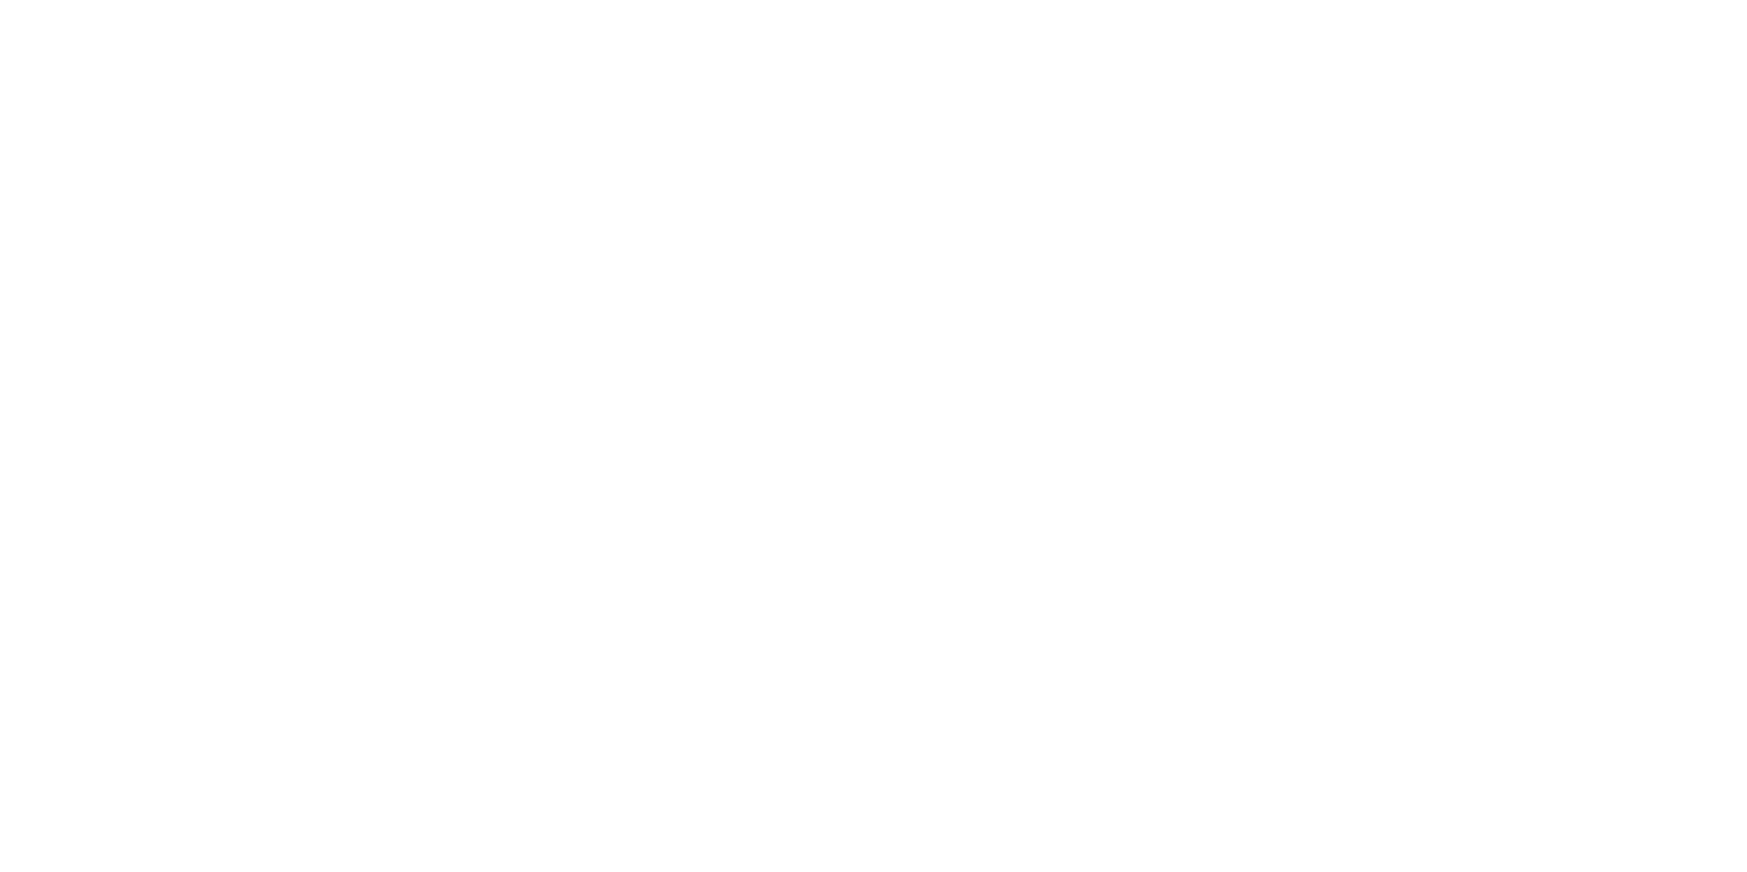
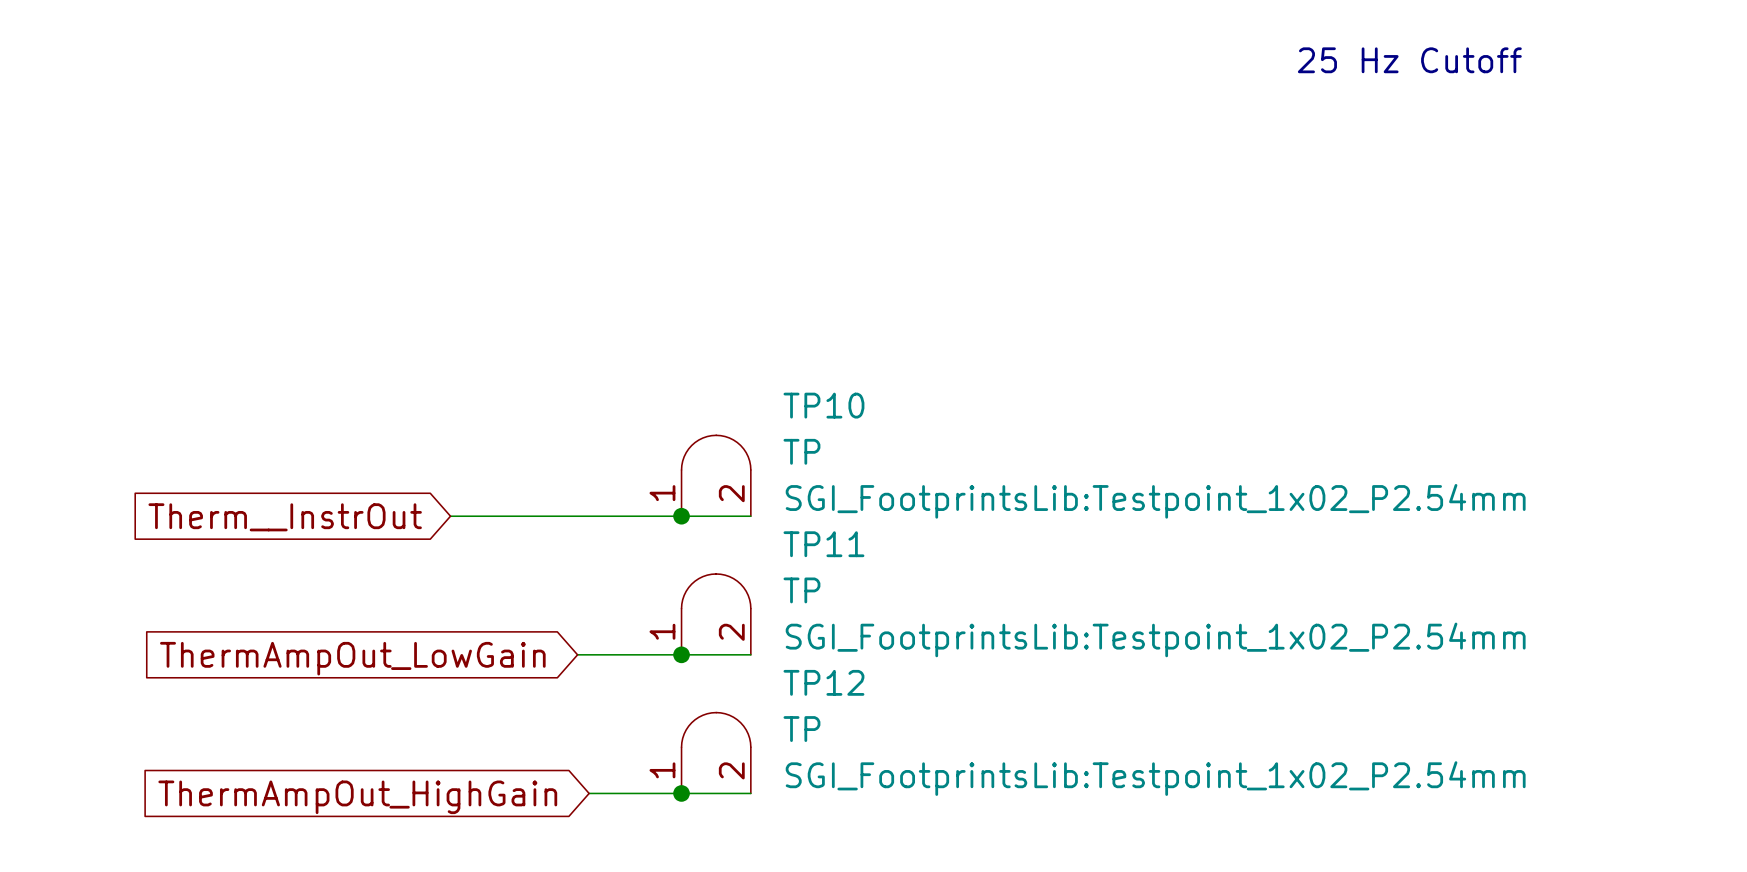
text: none -> 25 Hz Cutoff (1409, 60)
TP10: none -> TP (716, 475)
wire: none -> (450, 516) (750, 516)
junction: none -> (681, 516)
global label: none -> Therm__InstrOut (285, 517)
TP11: none -> TP (716, 614)
wire: none -> (577, 654) (750, 654)
junction: none -> (681, 654)
global label: none -> ThermAmpOut_LowGain (352, 658)
TP12: none -> TP (716, 753)
wire: none -> (589, 793) (750, 793)
junction: none -> (681, 793)
global label: none -> ThermAmpOut_HighGain (357, 797)

